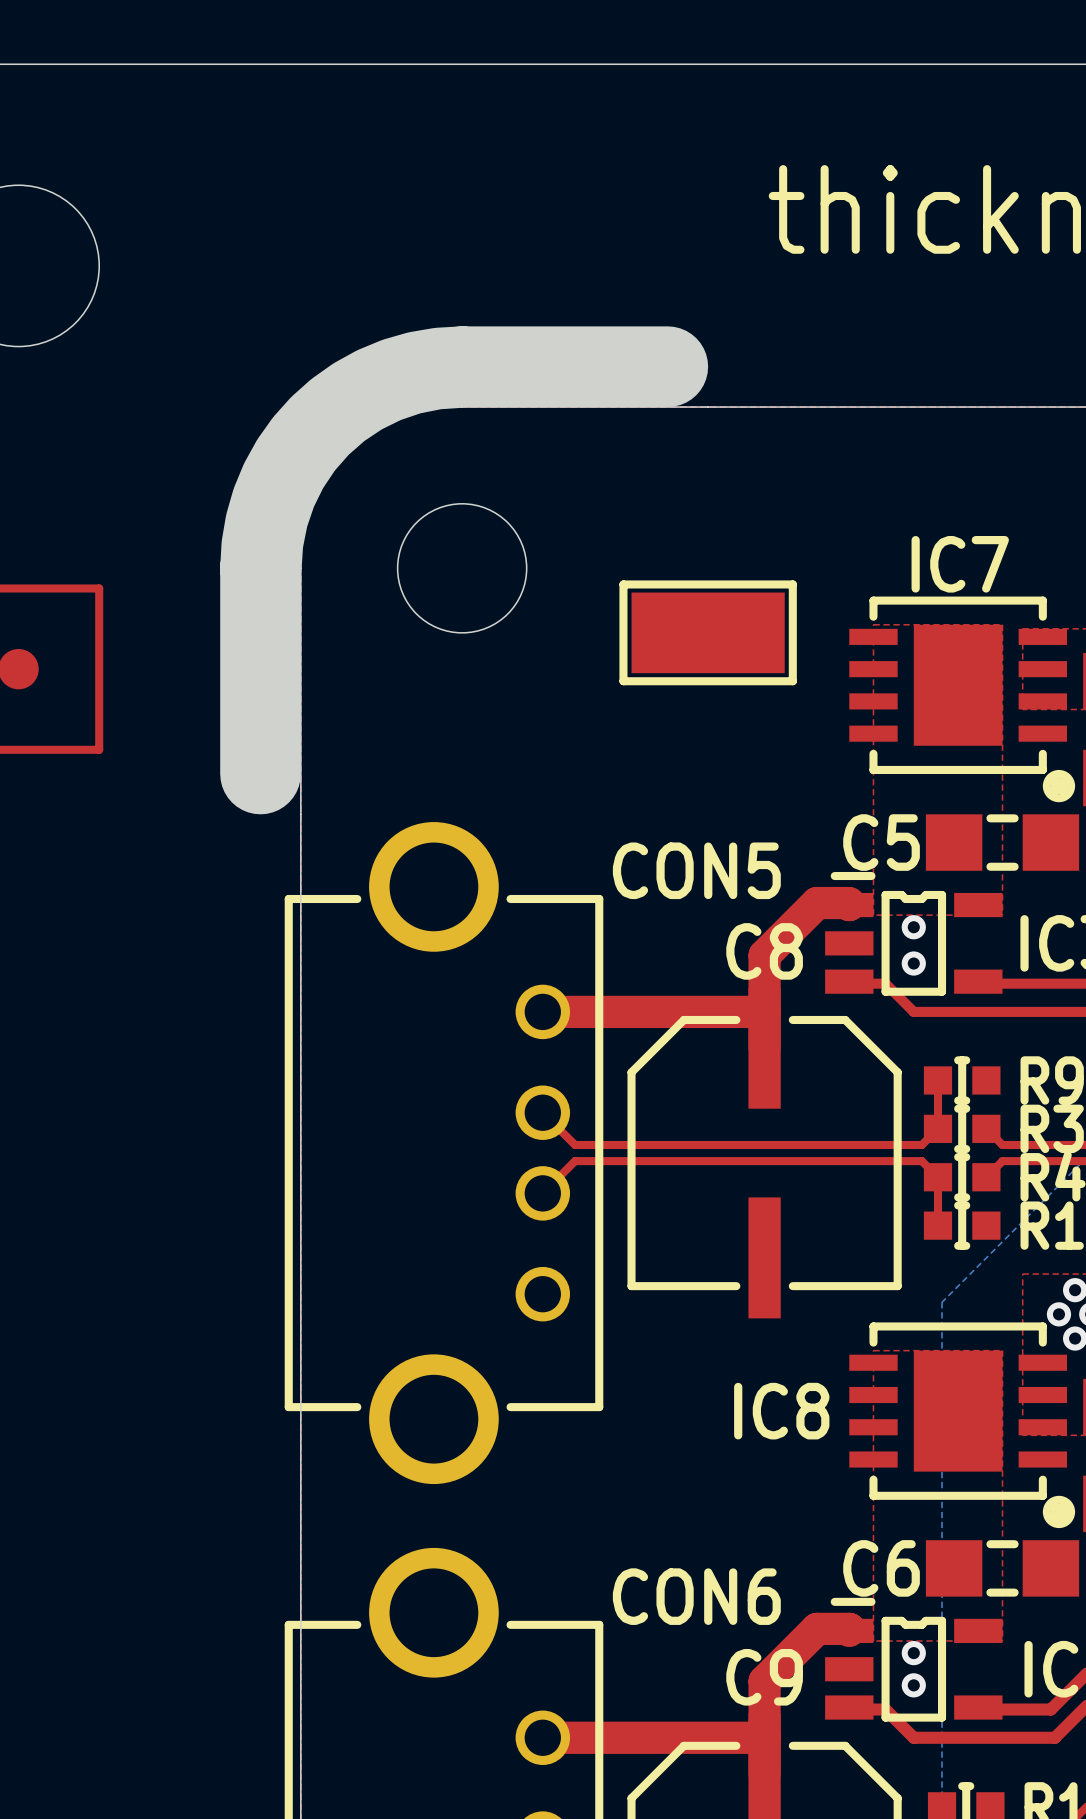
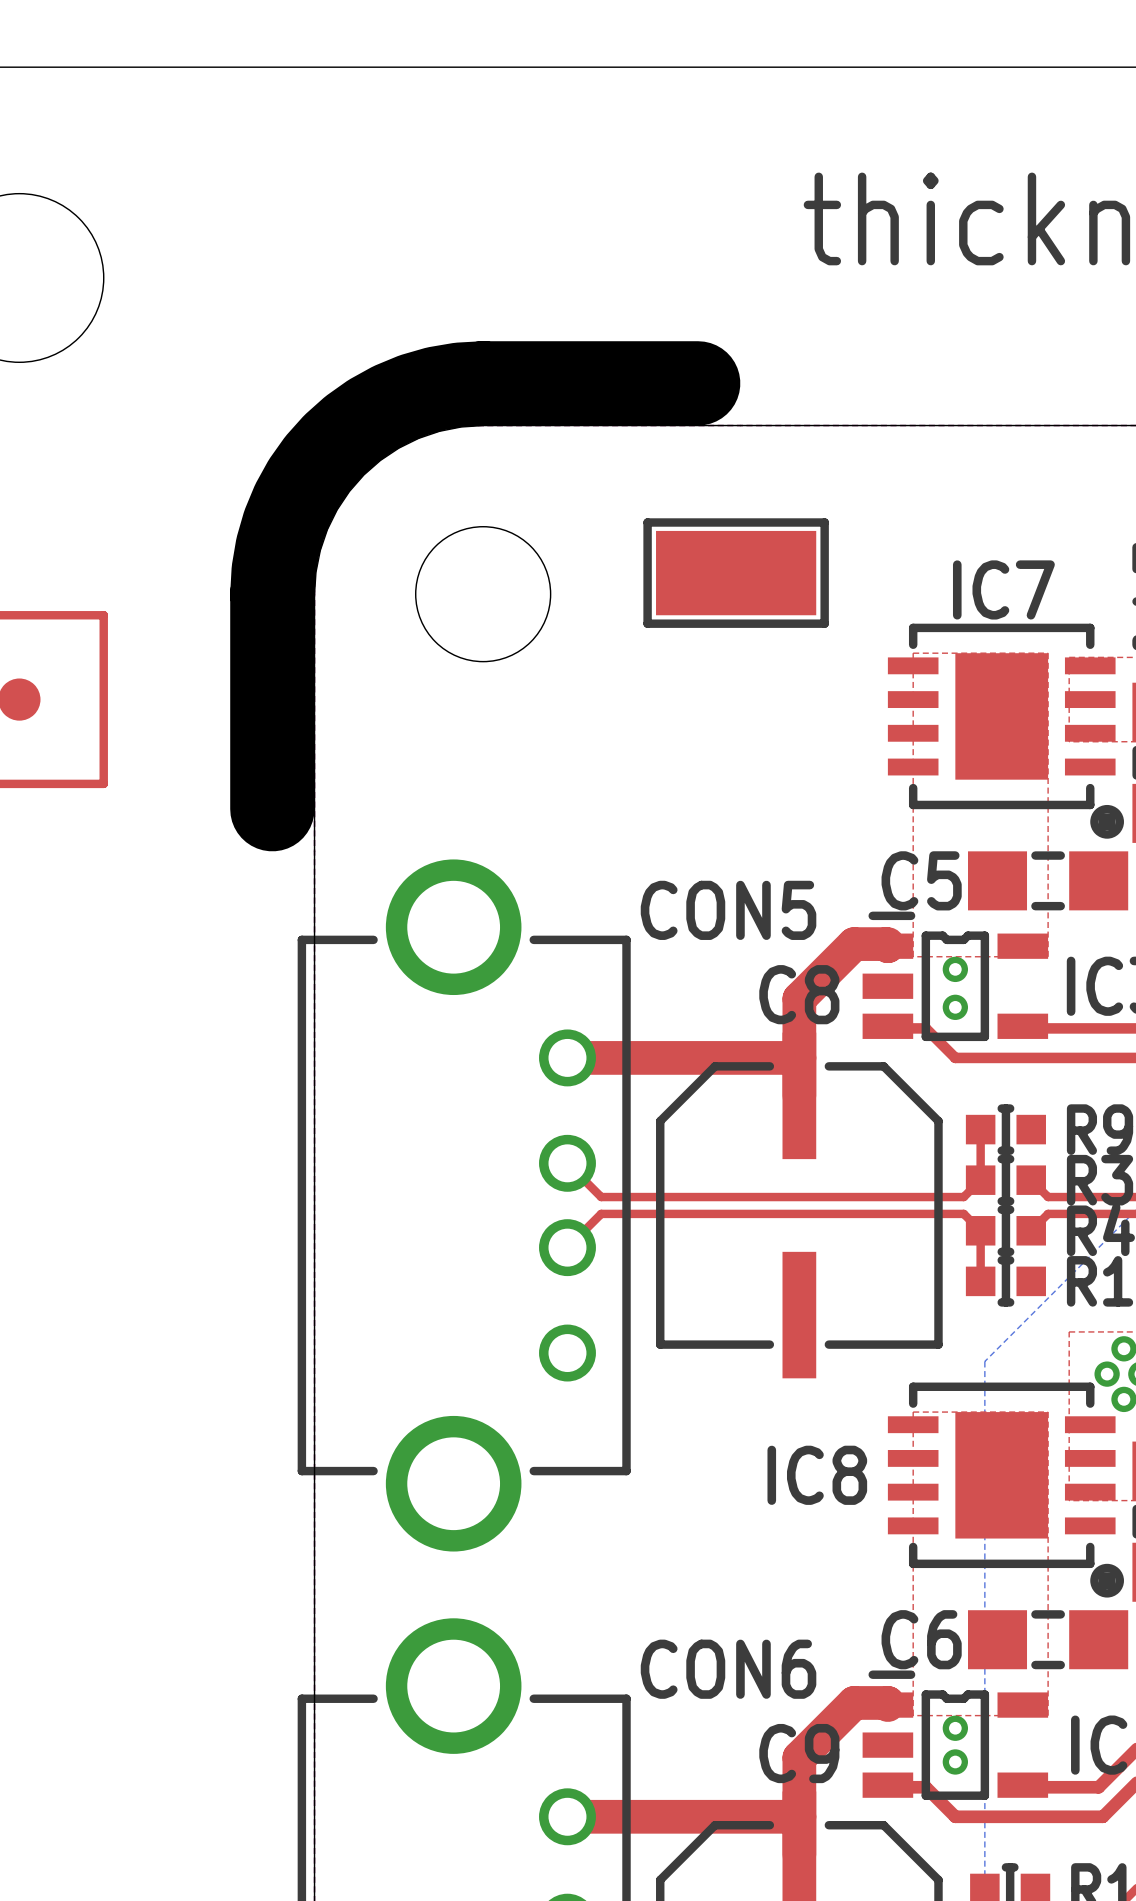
part position: (708, 632) -> (736, 573)

